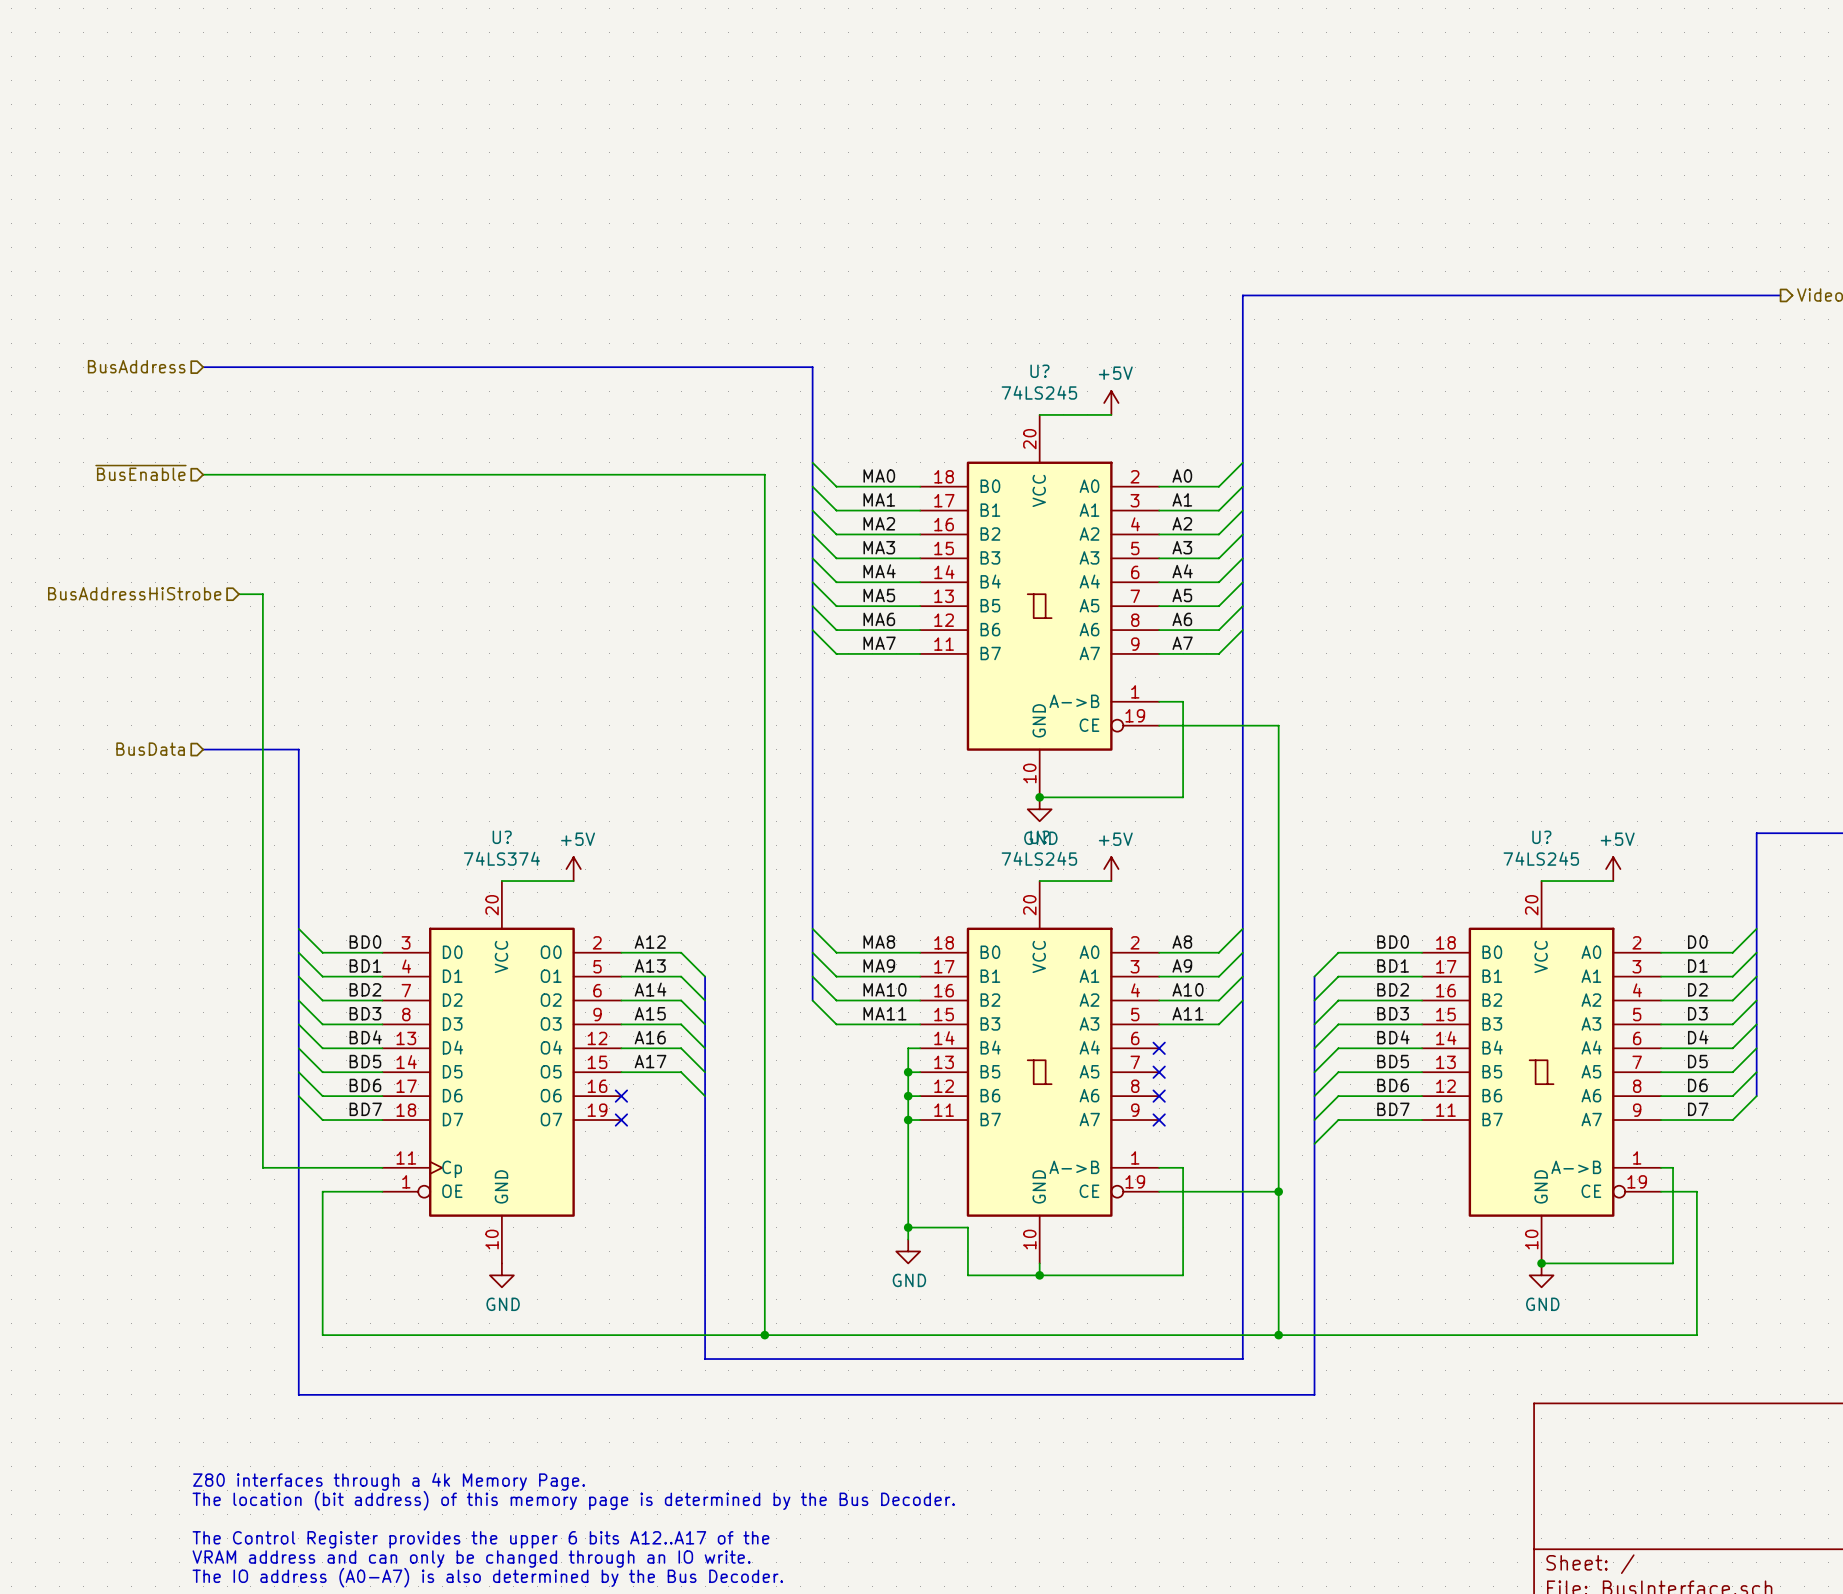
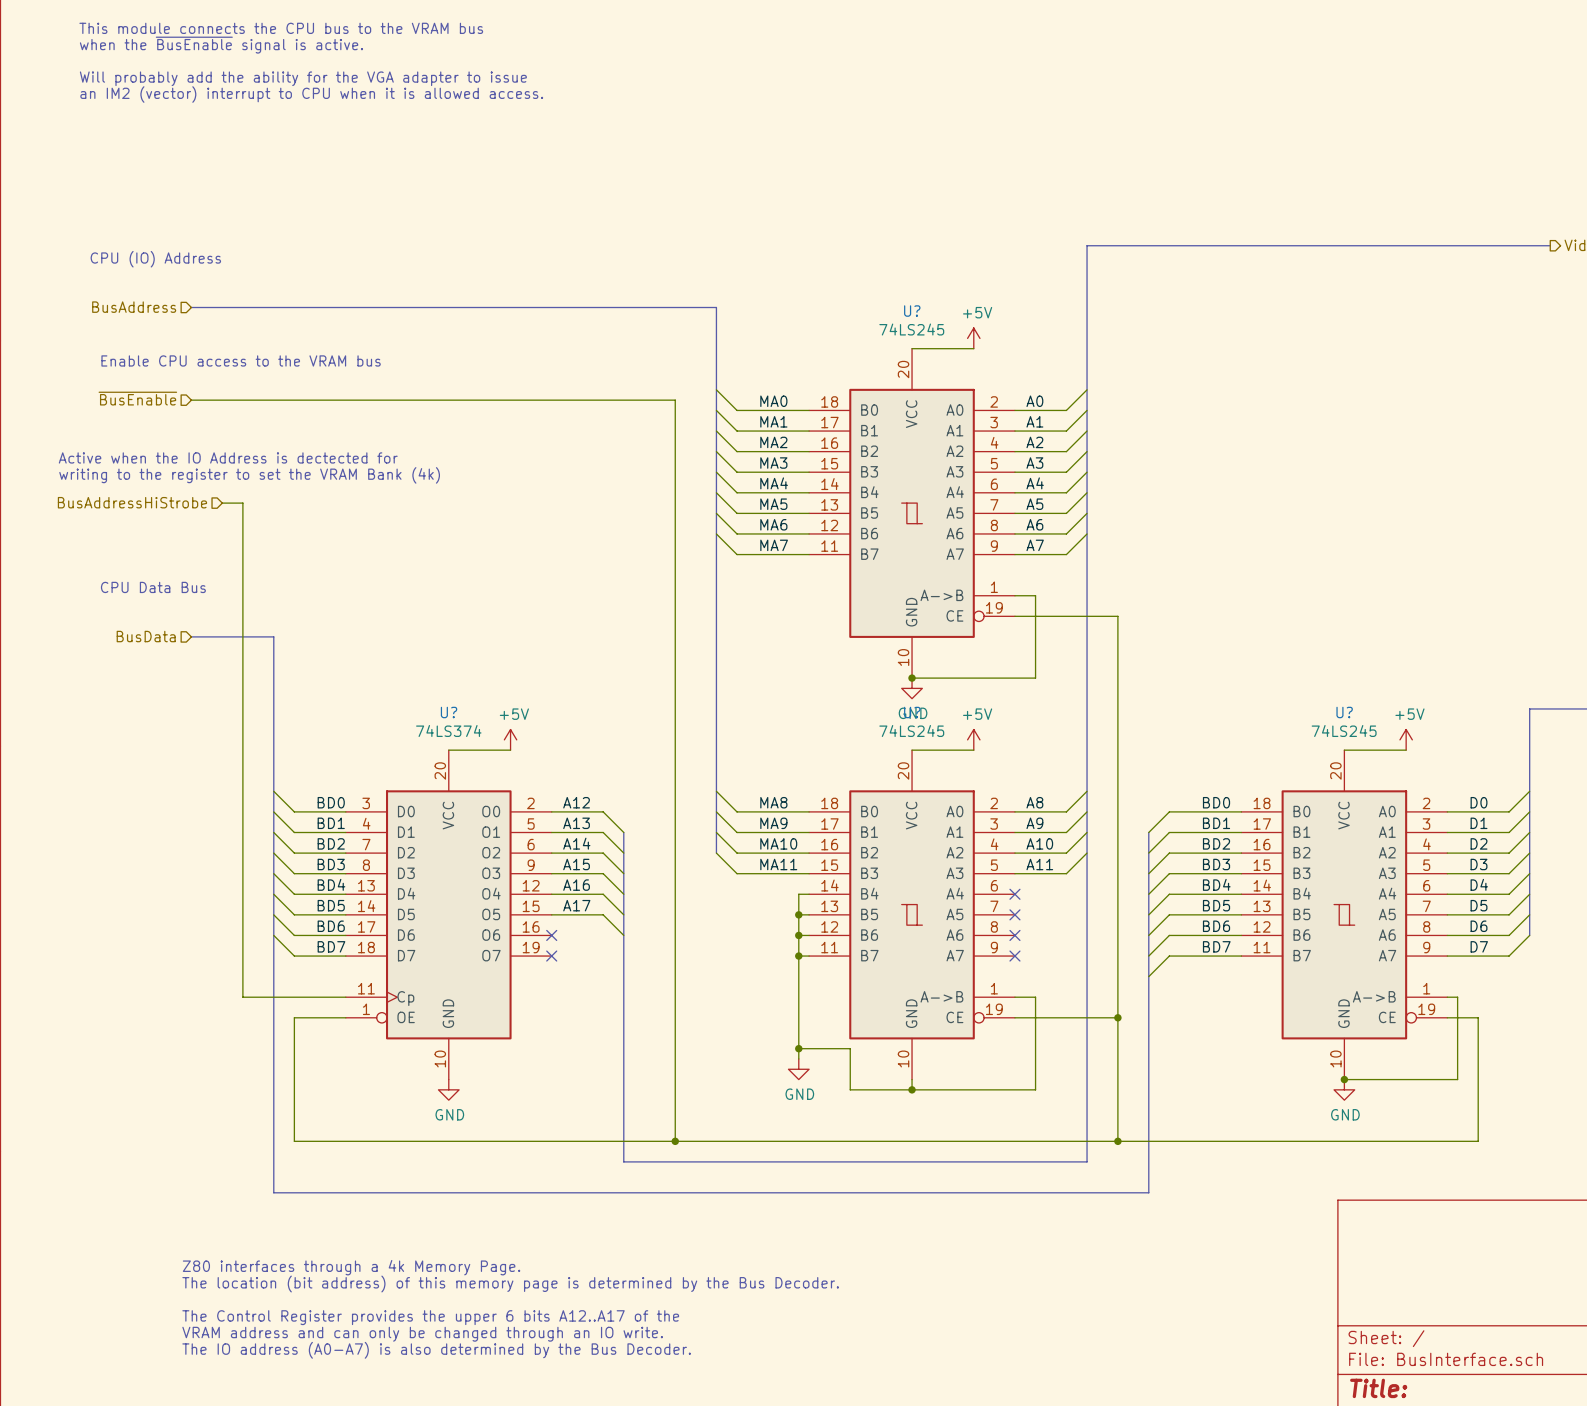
text: none -> This module connects the CPU bus to the VRAM bus (281, 28)
text: none -> when the ~{BusEnable} signal is active. (221, 45)
text: none -> Will probably add the ability for the VGA adapter to issue (303, 78)
text: none -> an IM2 (vector) interrupt to CPU when it is allowed access. (311, 94)
text: none -> CPU (IO) Address (155, 259)
text: none -> Enable CPU access to the VRAM bus (241, 360)
text: none -> Active when the IO Address is dectected for (228, 457)
text: none -> writing to the register to set the VRAM Bank (4k) (249, 475)
text: none -> CPU Data Bus (153, 587)

